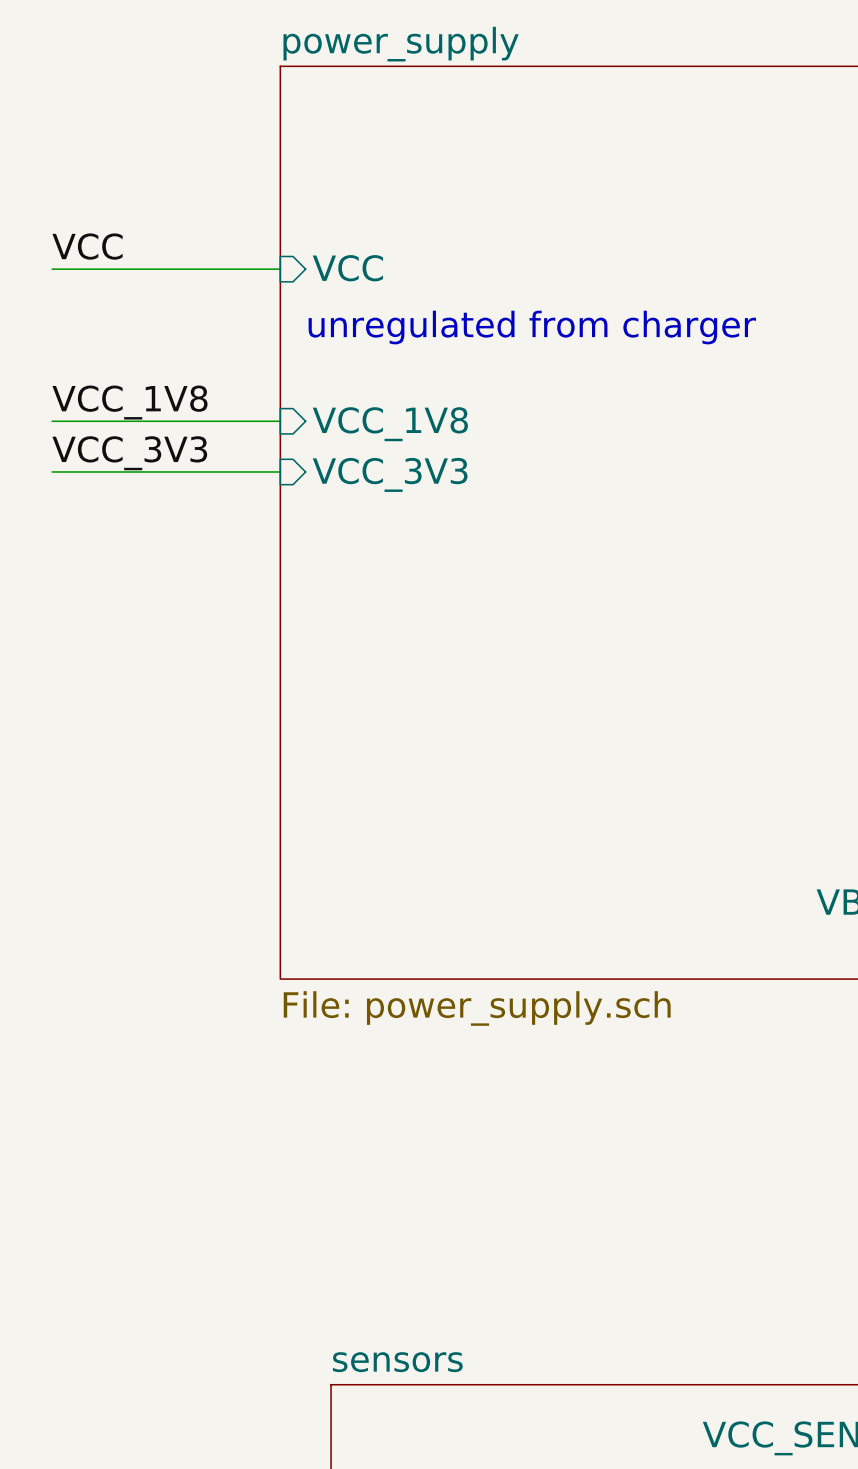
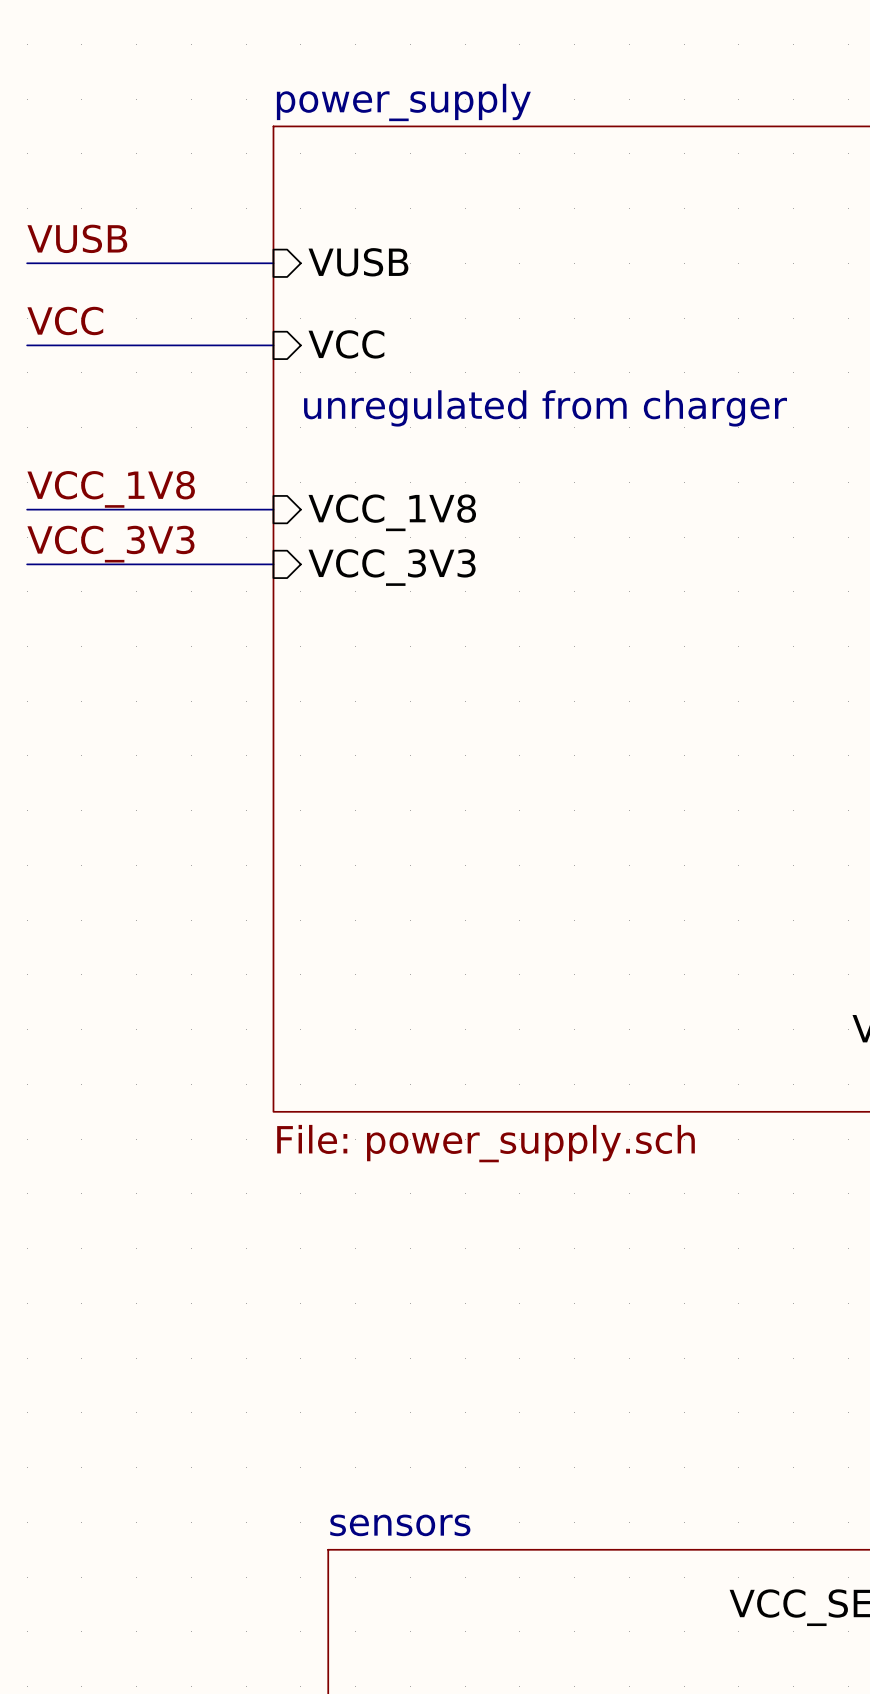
label: none -> VUSB (77, 238)
sheet pin: none -> VUSB (358, 262)
wire: none -> (27, 263) (273, 263)

